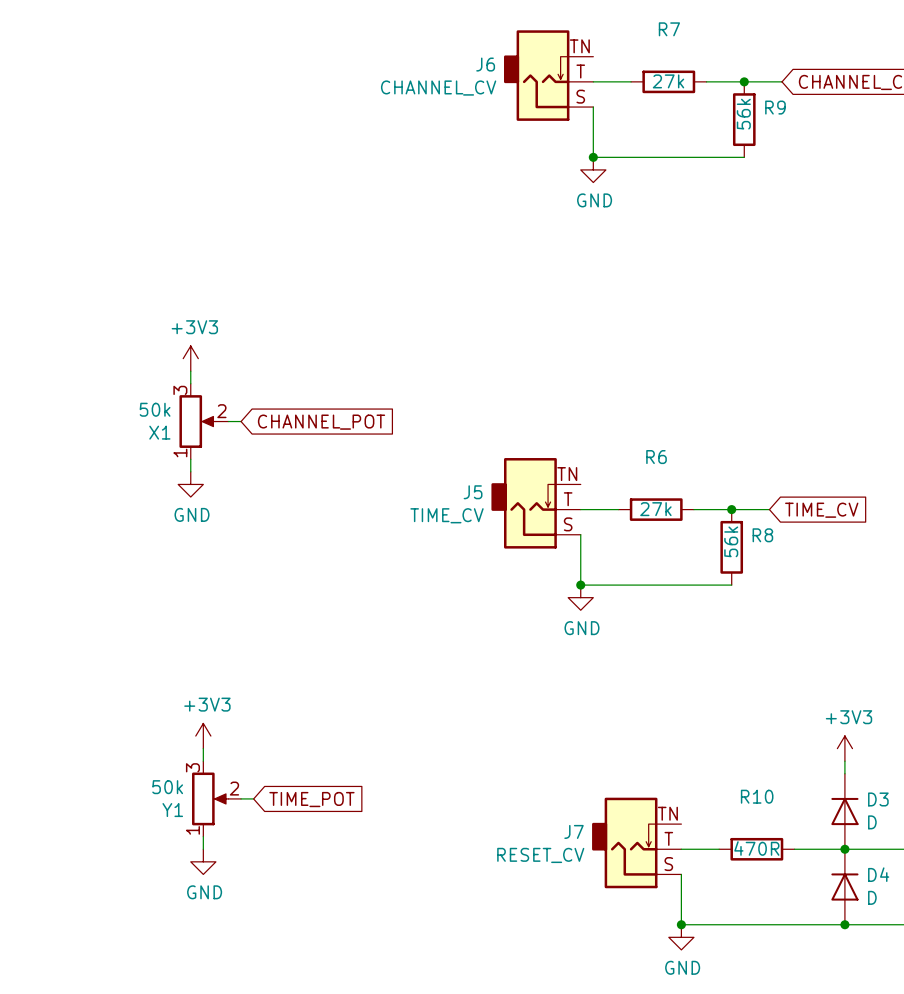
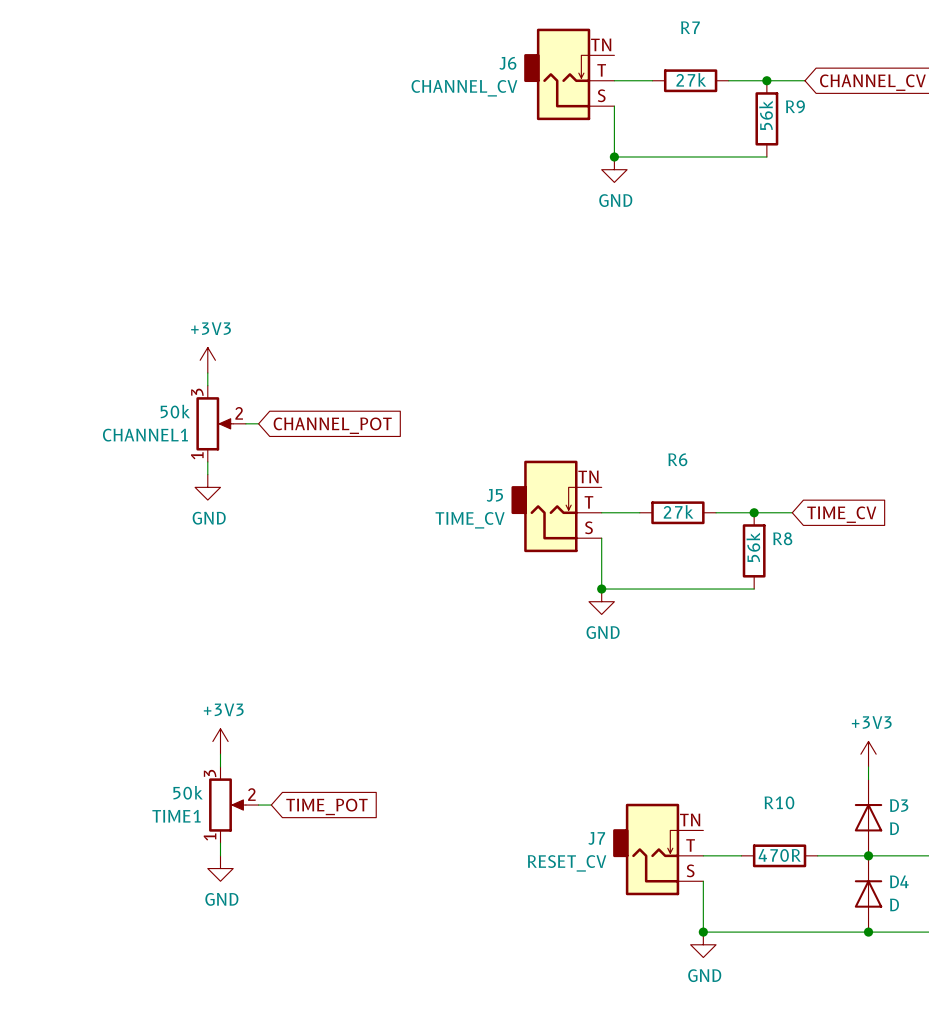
X1 name: X1 (159, 432) -> CHANNEL1 (145, 435)
Y1 name: Y1 (172, 810) -> TIME1 (176, 816)

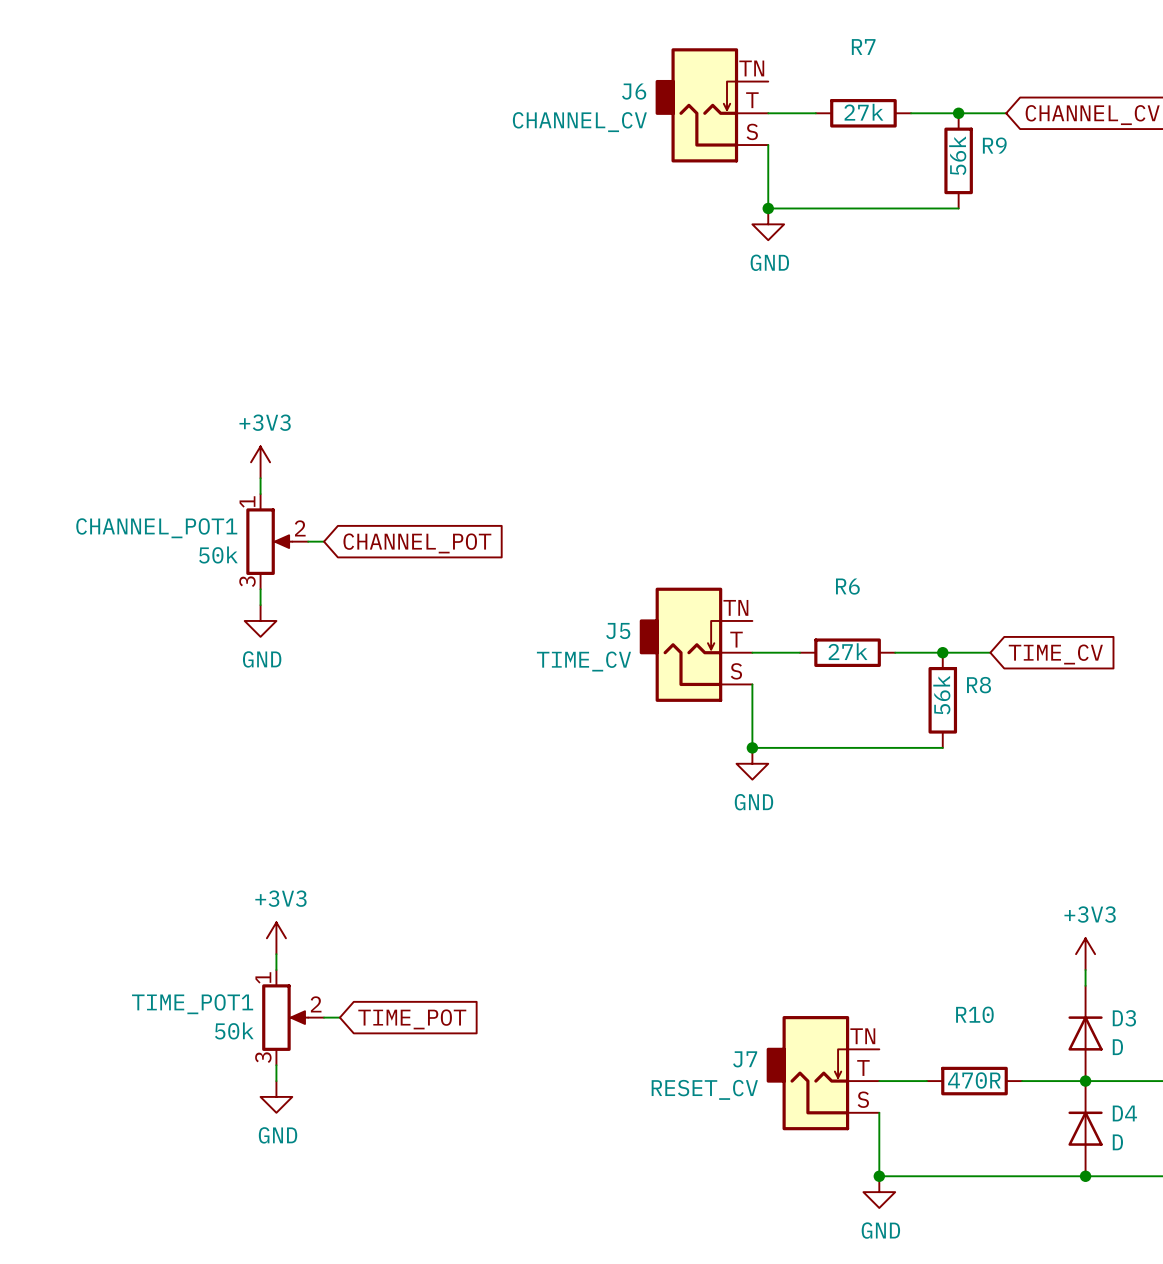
CHANNEL1 flip: as is (214, 423) -> up-down (269, 541)
CHANNEL1 name: CHANNEL1 (145, 435) -> CHANNEL_POT1 (156, 528)
TIME1 flip: as is (227, 805) -> up-down (285, 1017)
TIME1 name: TIME1 (176, 816) -> TIME_POT1 (192, 1004)

